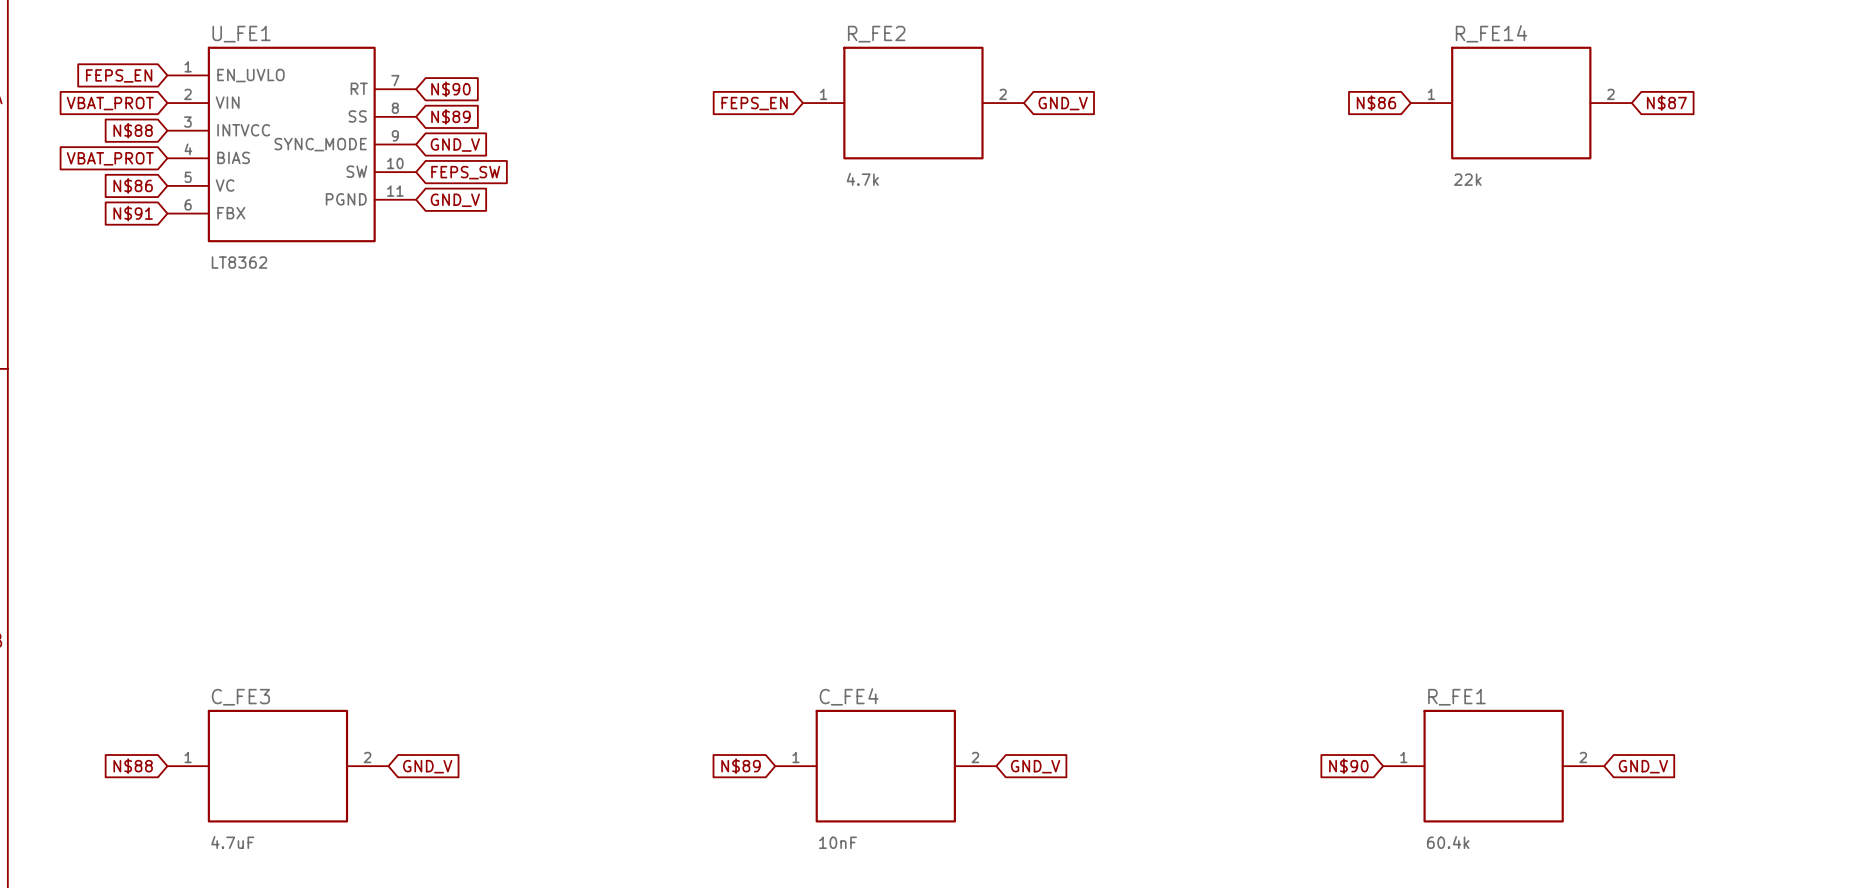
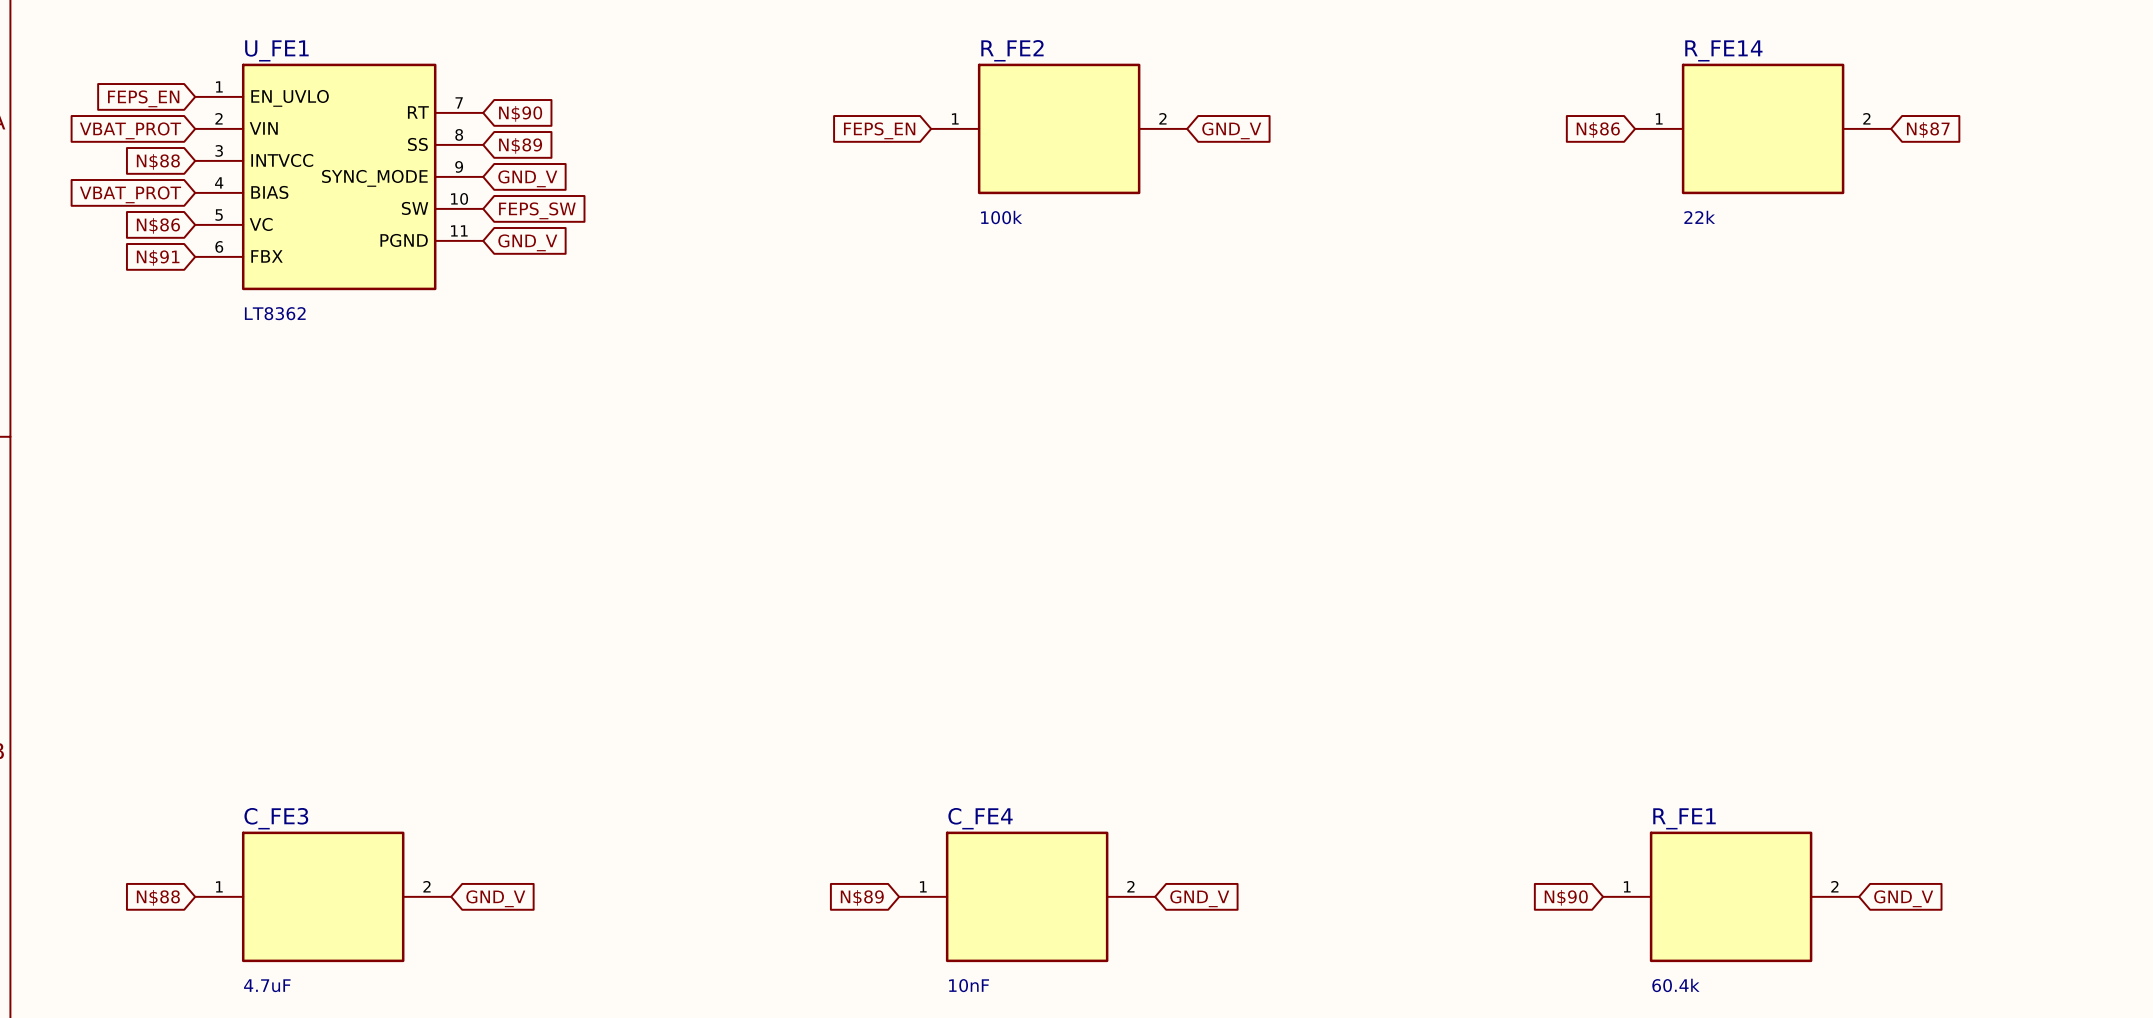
R_FE2 value: 4.7k (862, 179) -> 100k (1001, 217)

